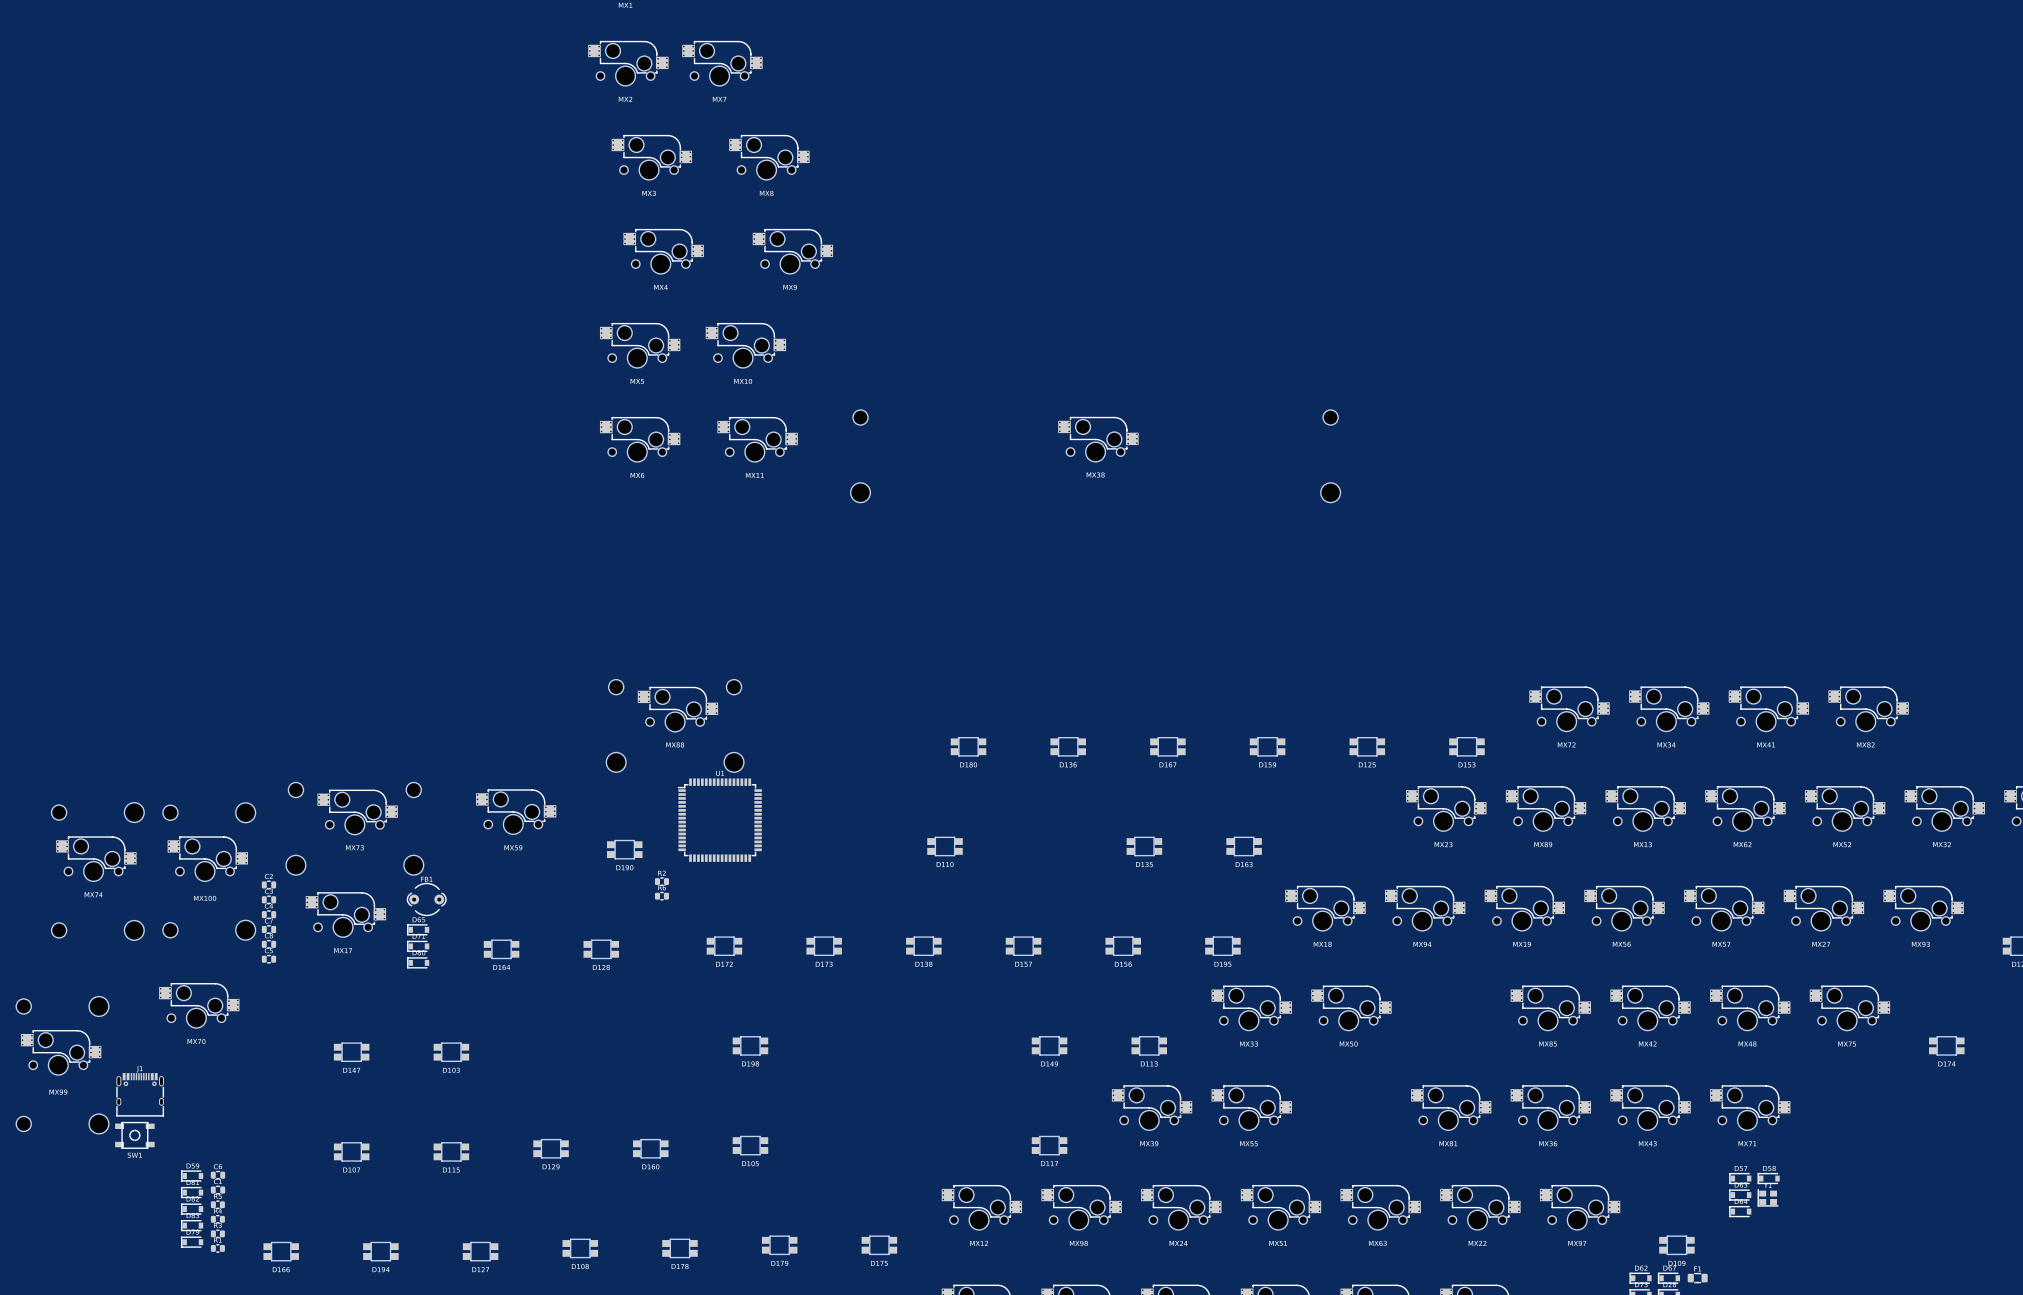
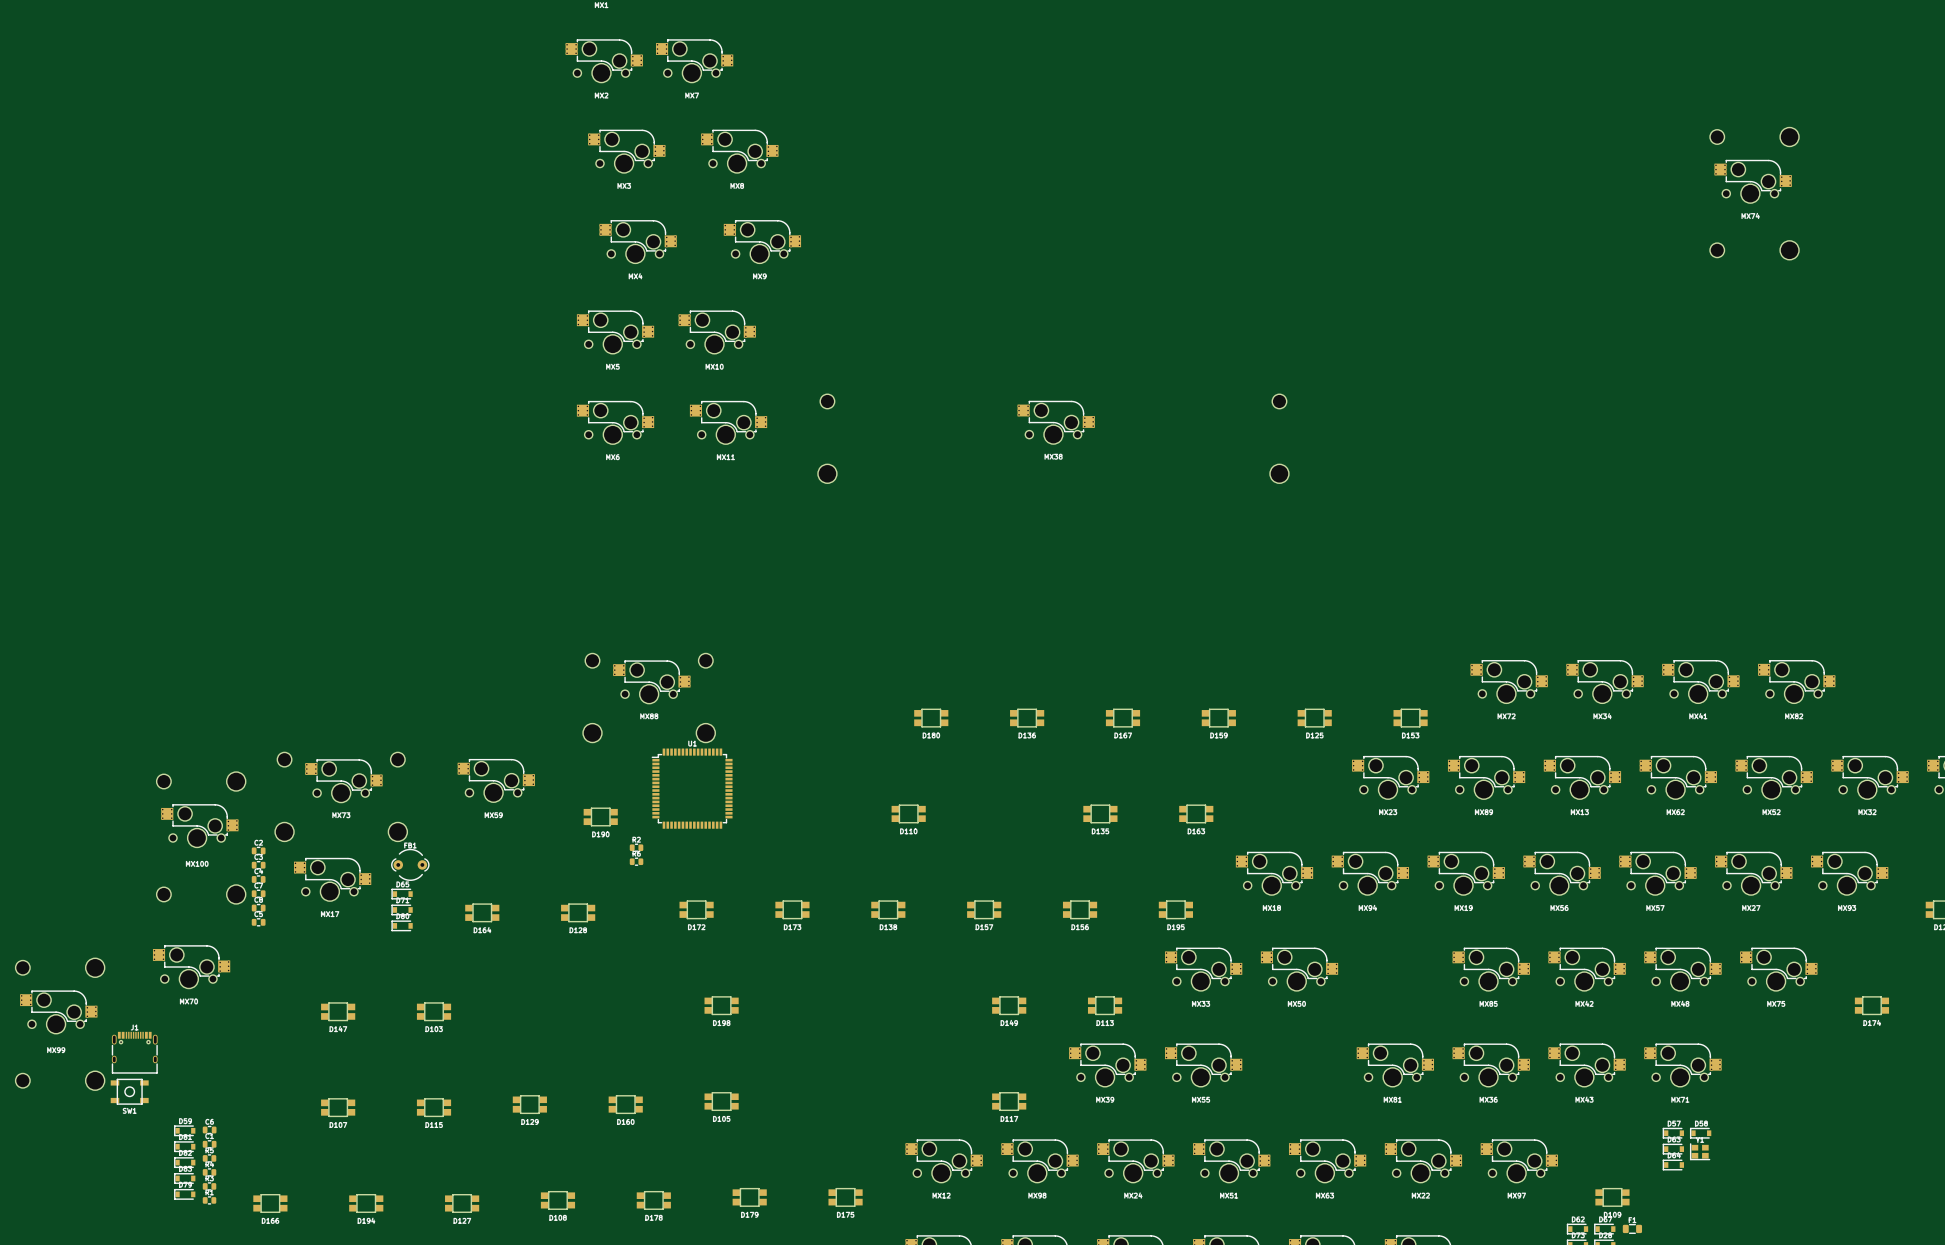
part position: (97, 871) -> (1754, 193)

